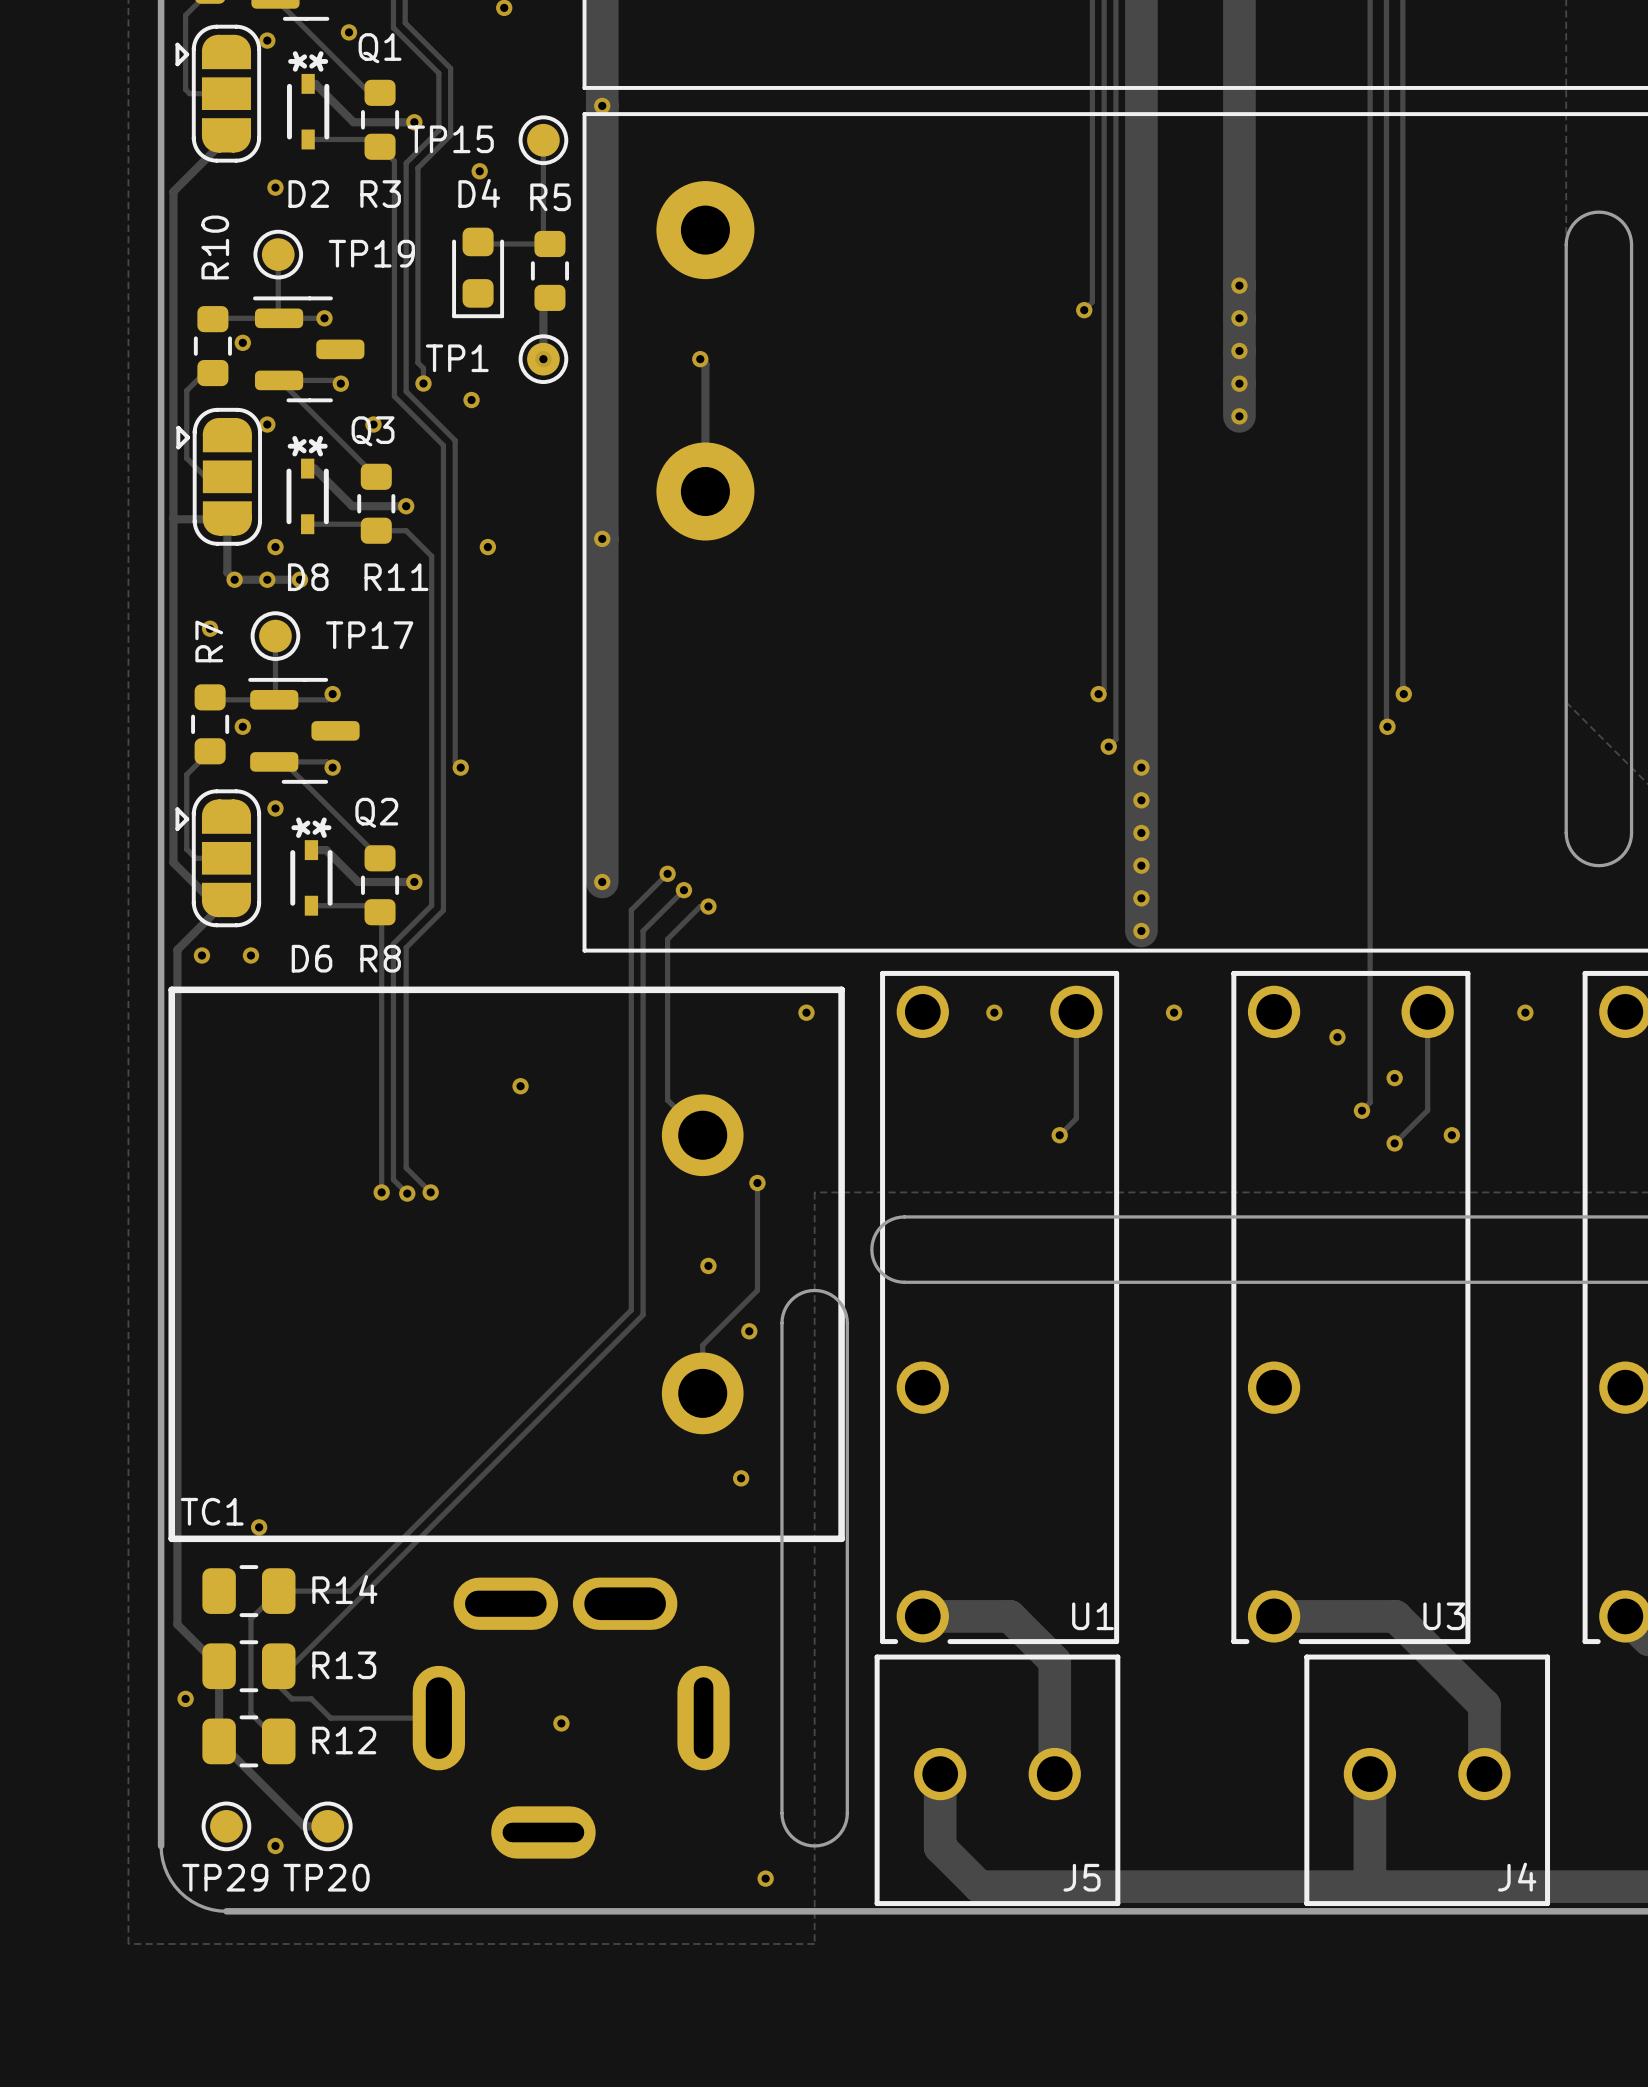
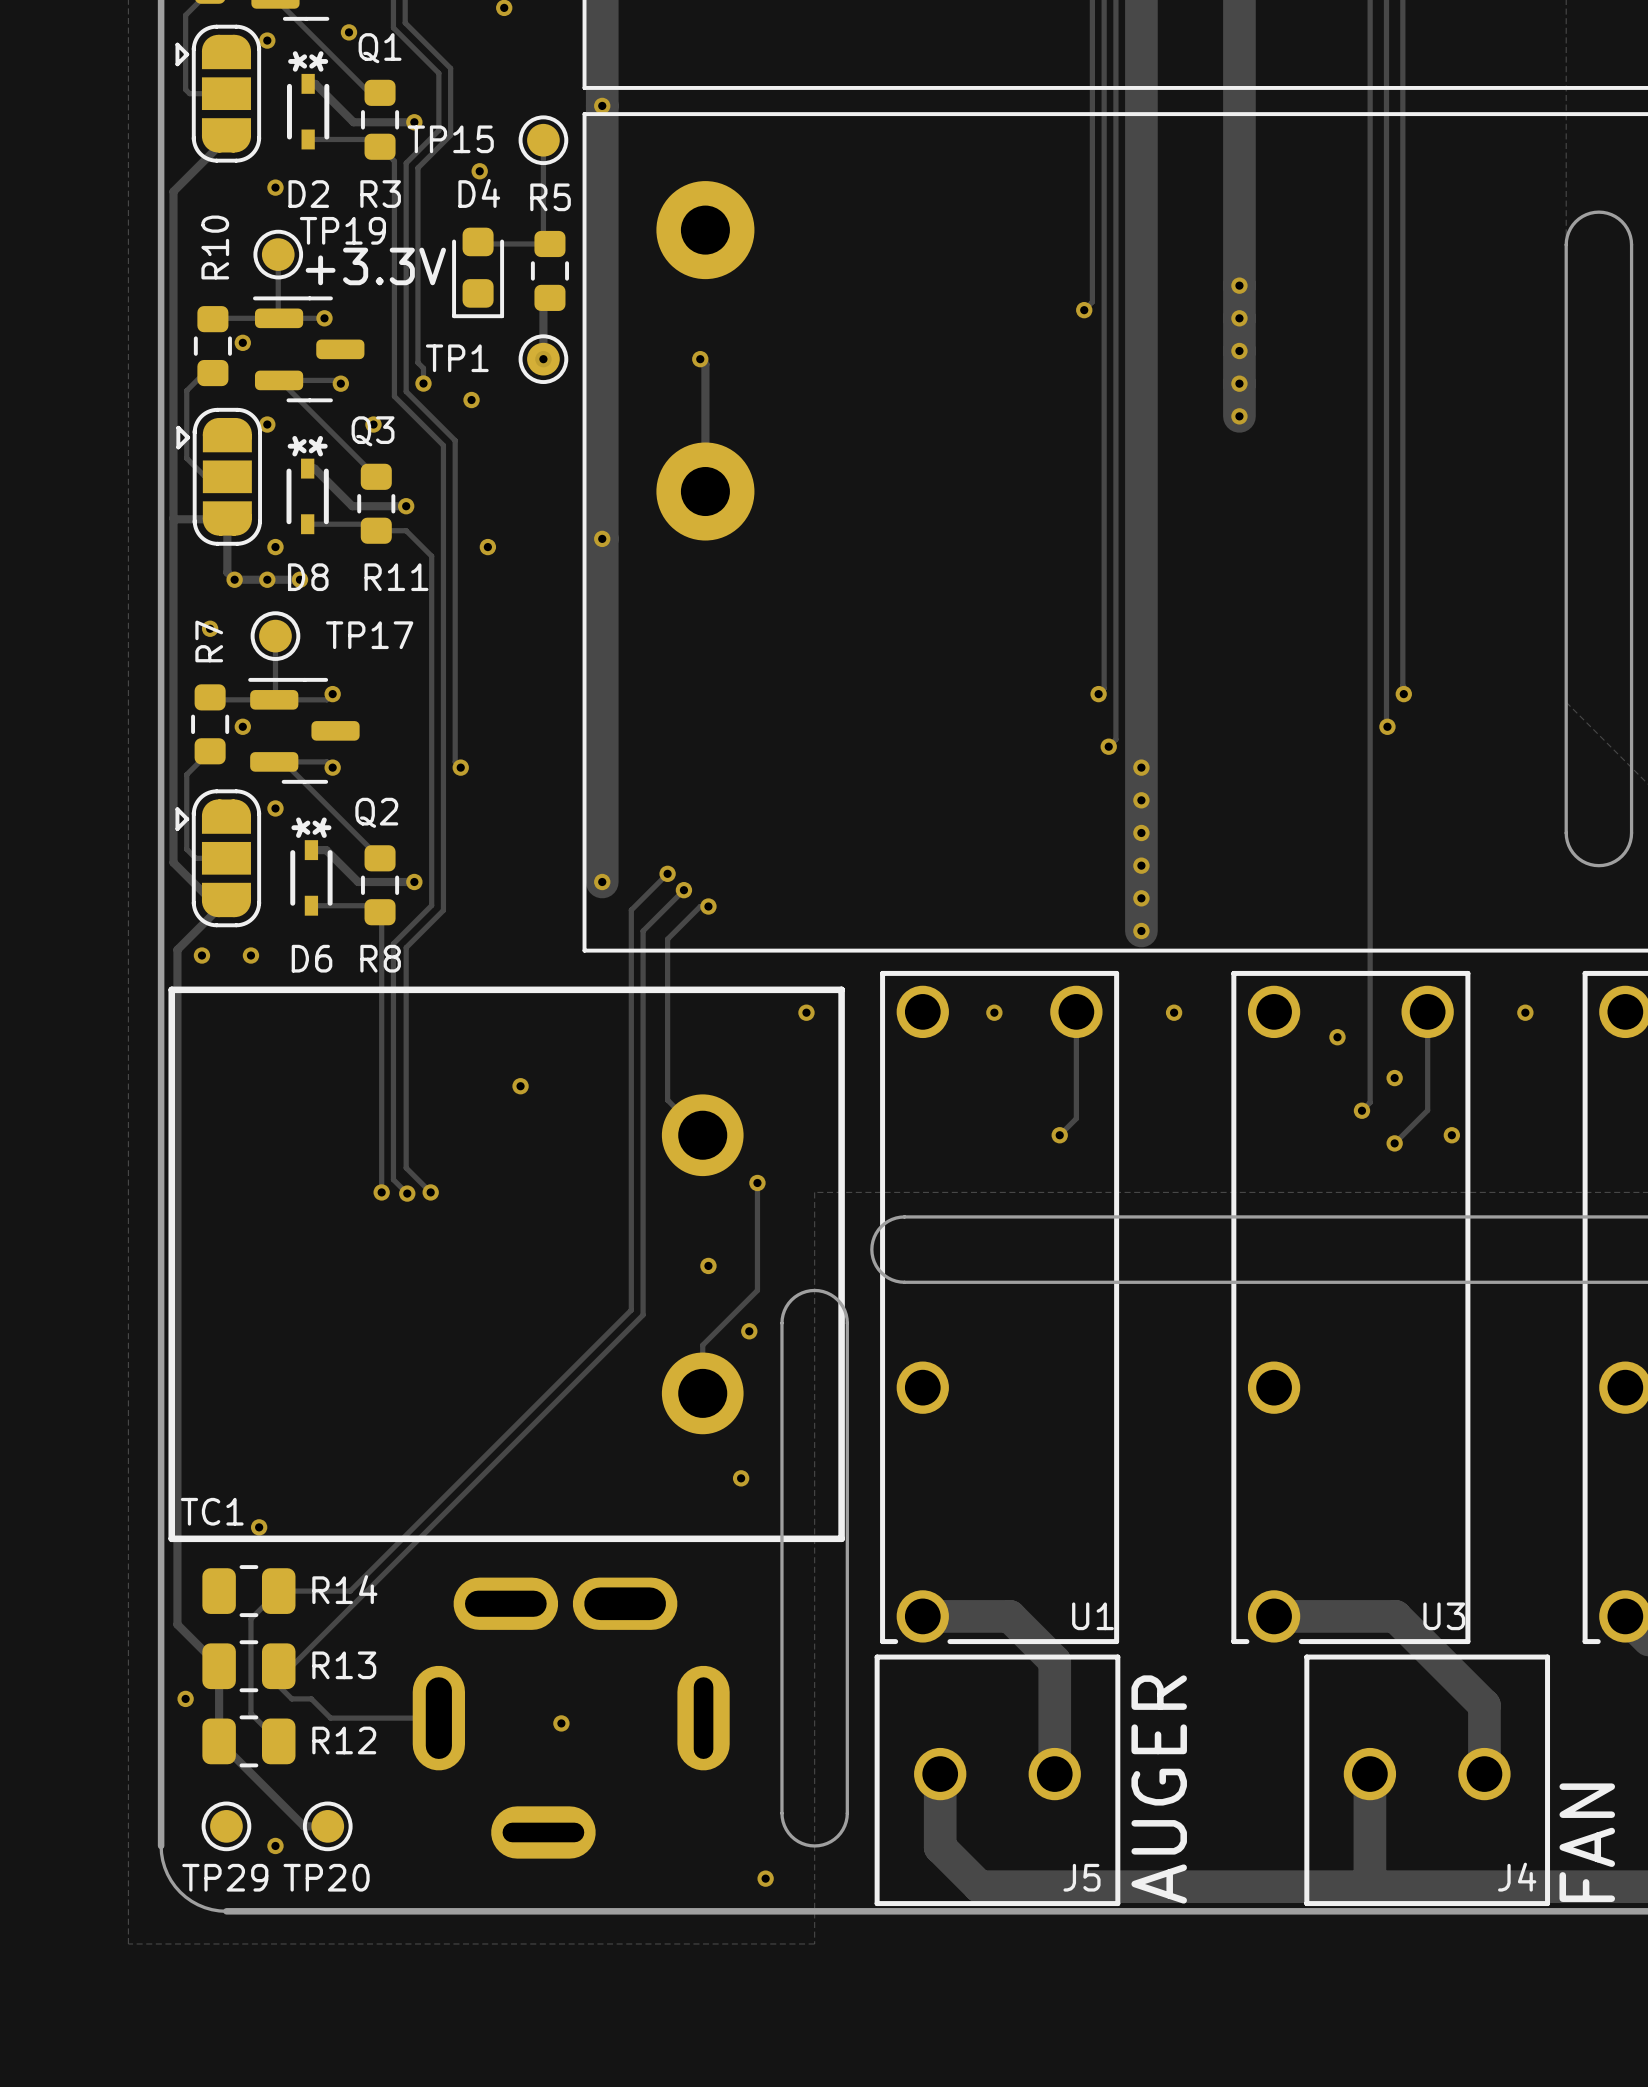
TP19 name position: TP19 (371, 253) -> TP19 (342, 230)
text: none -> +3.3V (375, 266)
text: none -> AUGER (1159, 1789)
text: none -> FAN (1587, 1842)

